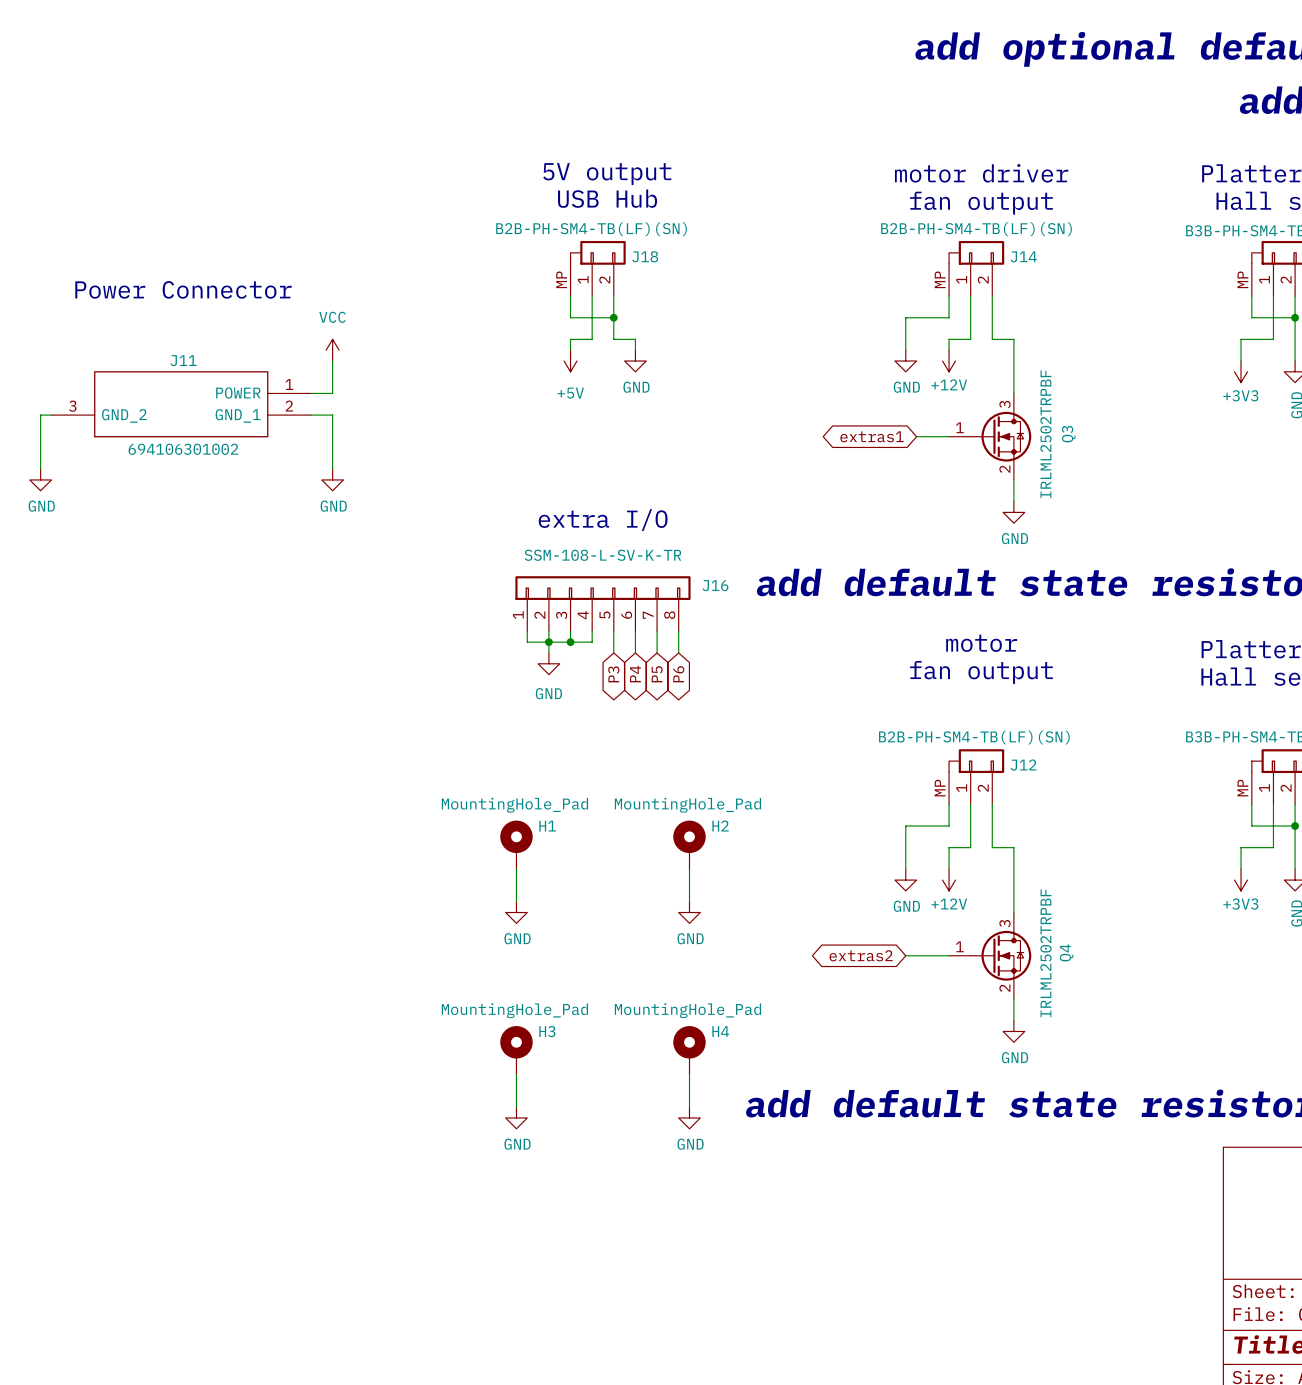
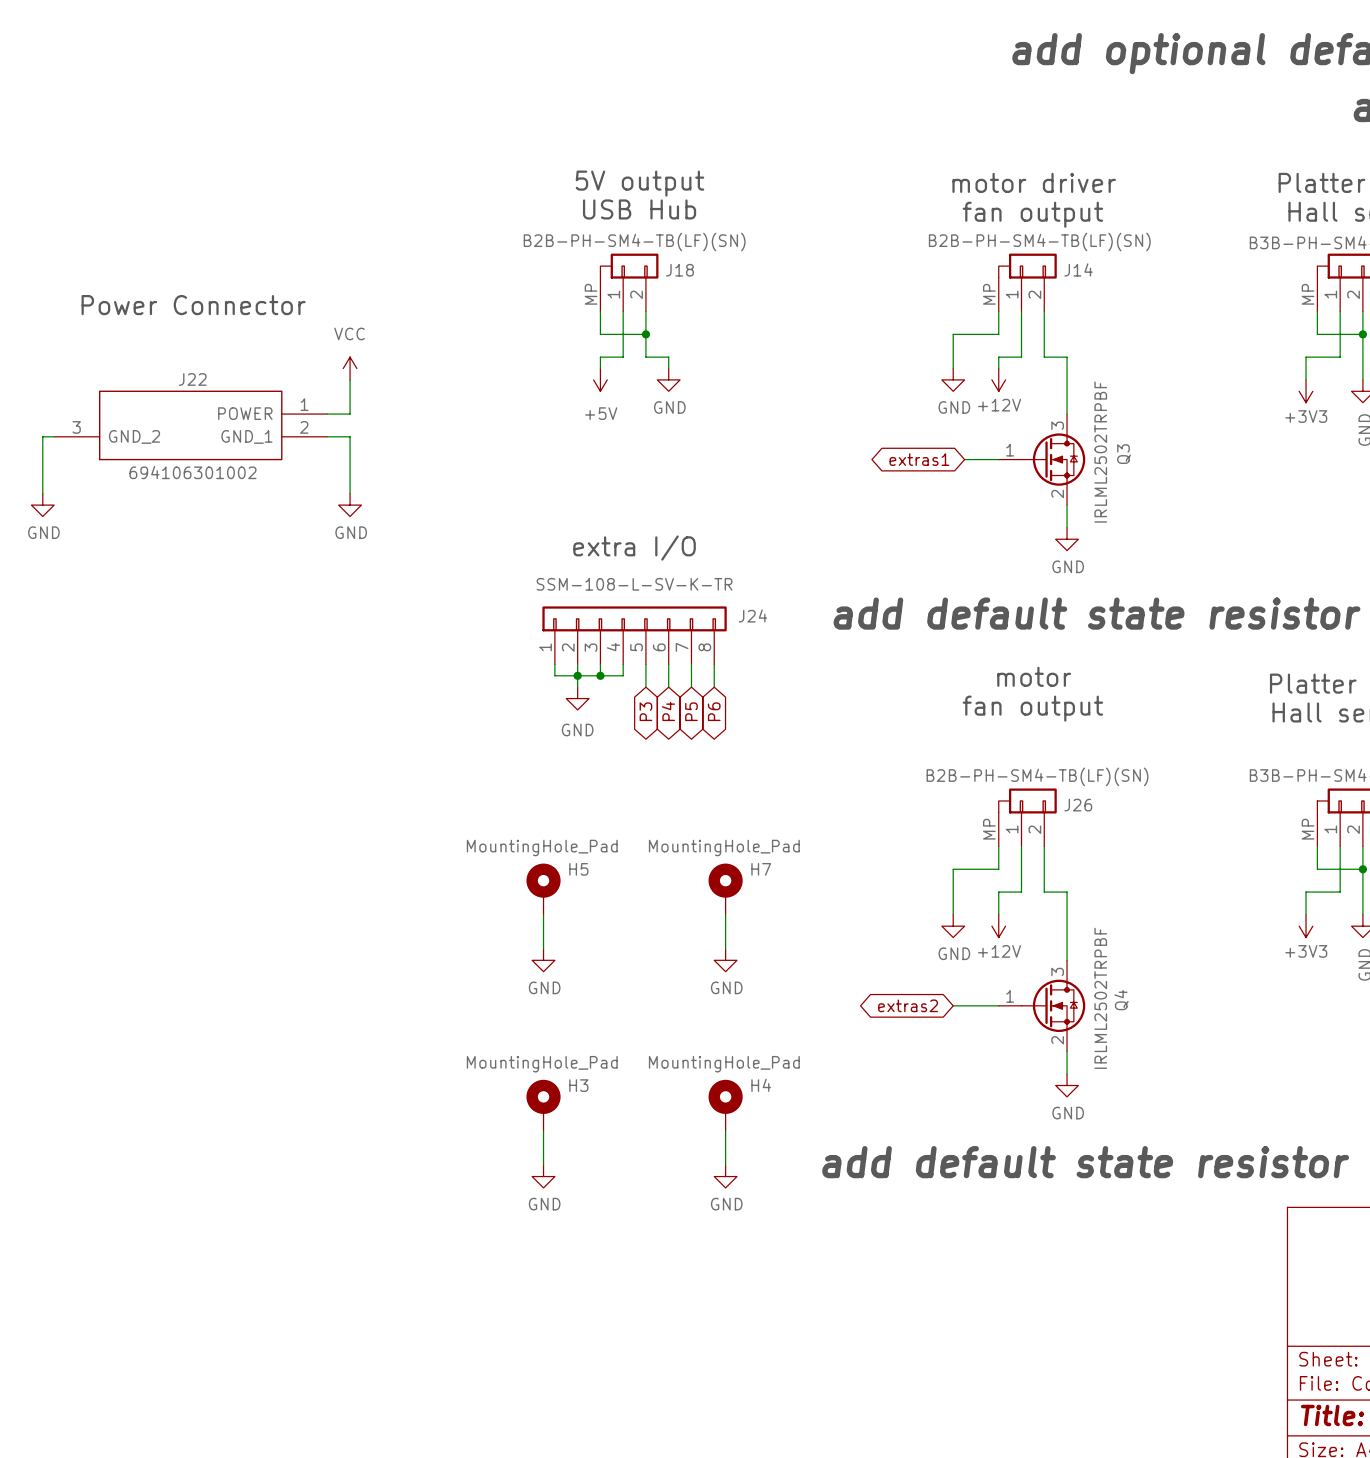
J11 name: J11 (183, 360) -> J22 (192, 379)
J16 name: J16 (715, 585) -> J24 (752, 615)
J12 name: J12 (1023, 765) -> J26 (1078, 805)
H1 name: H1 (547, 826) -> H5 (578, 869)
H2 name: H2 (720, 826) -> H7 (761, 869)

